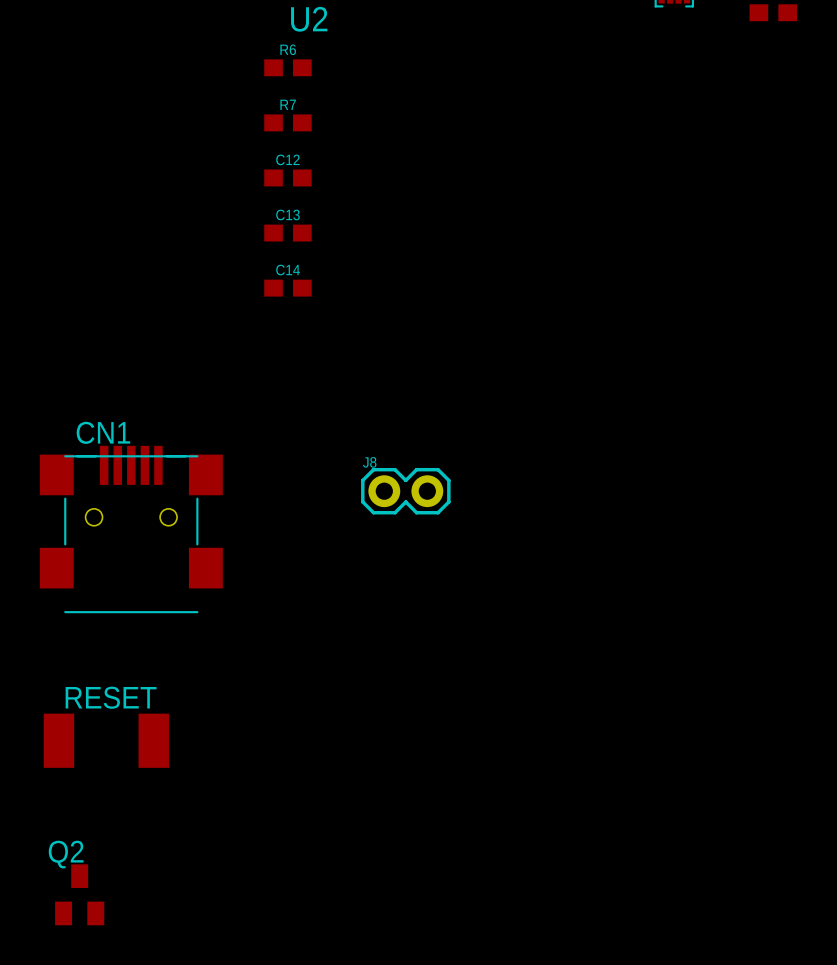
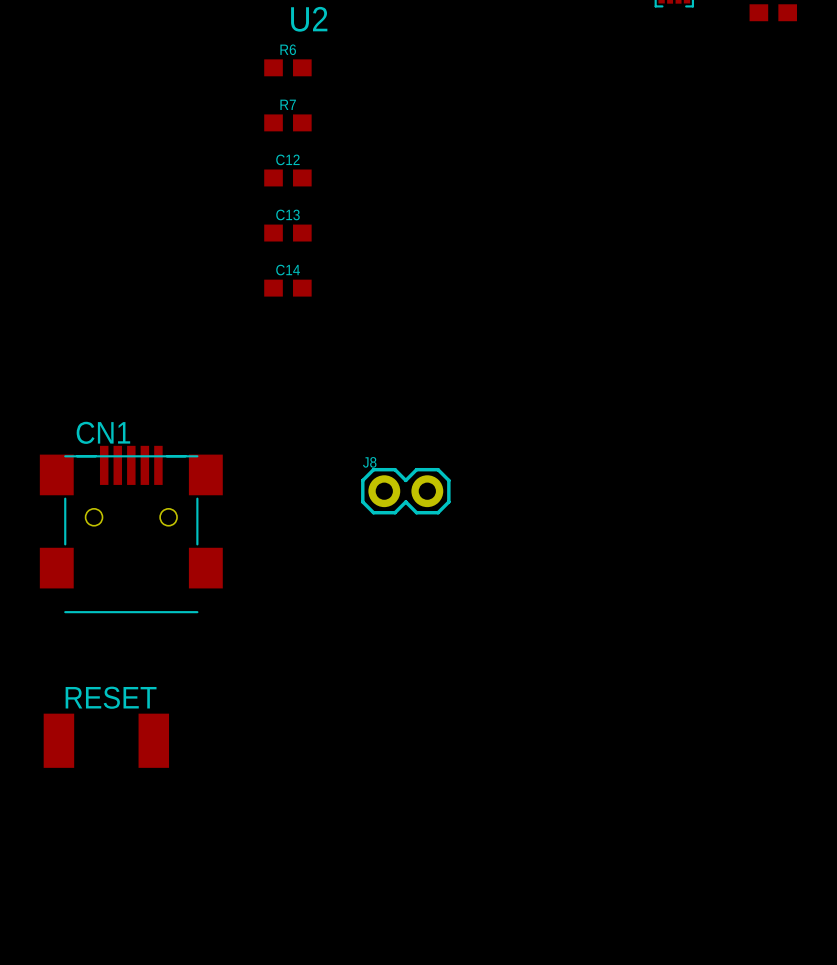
Q2: (79, 894) -> none

